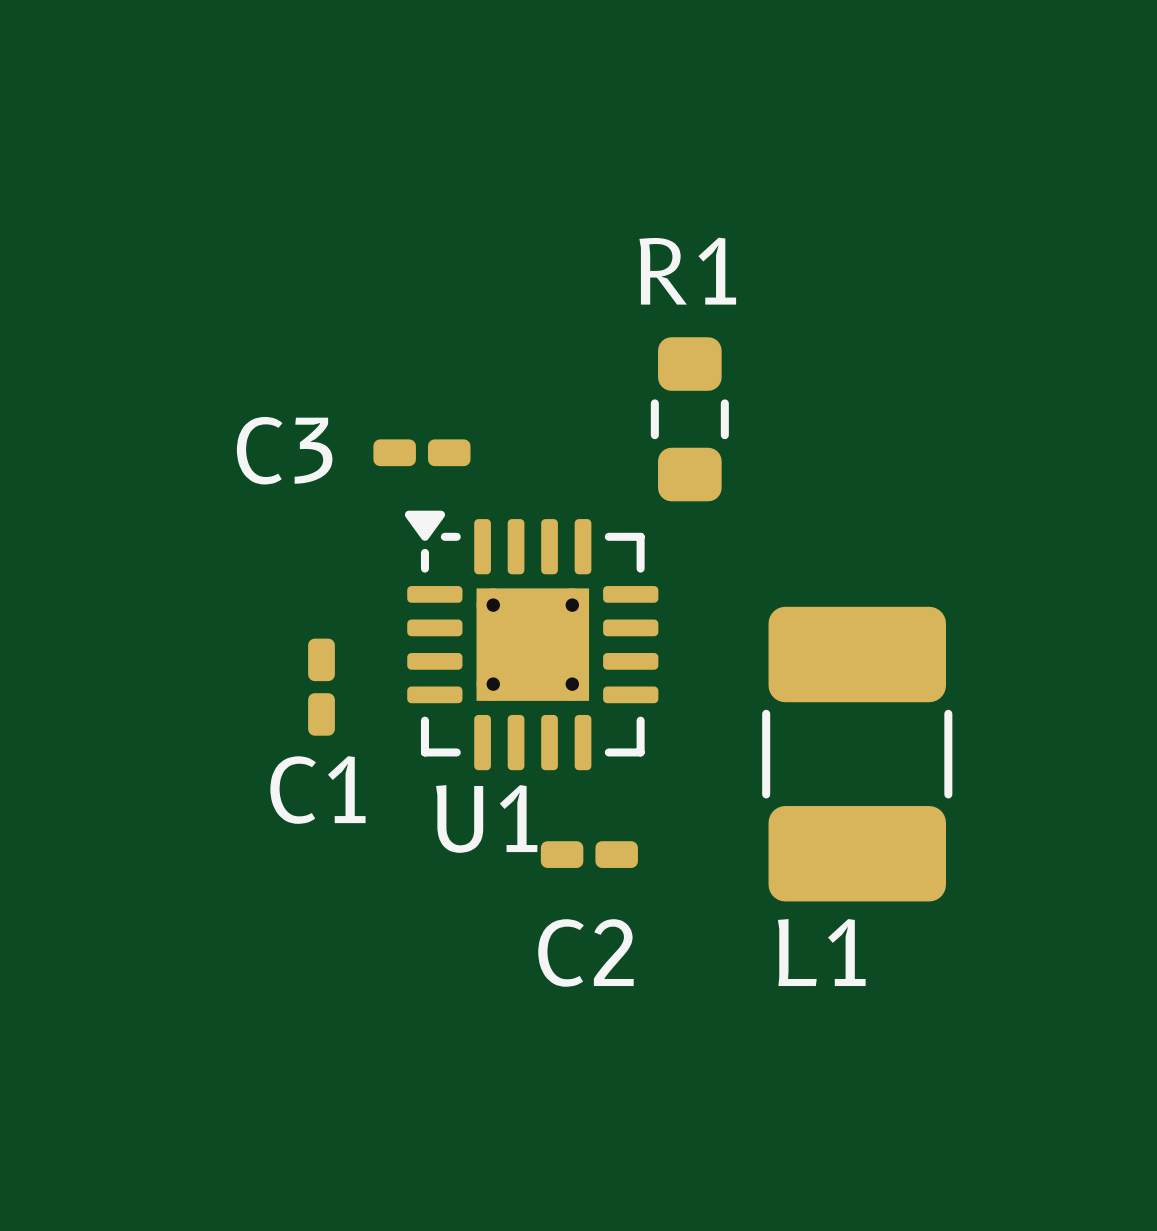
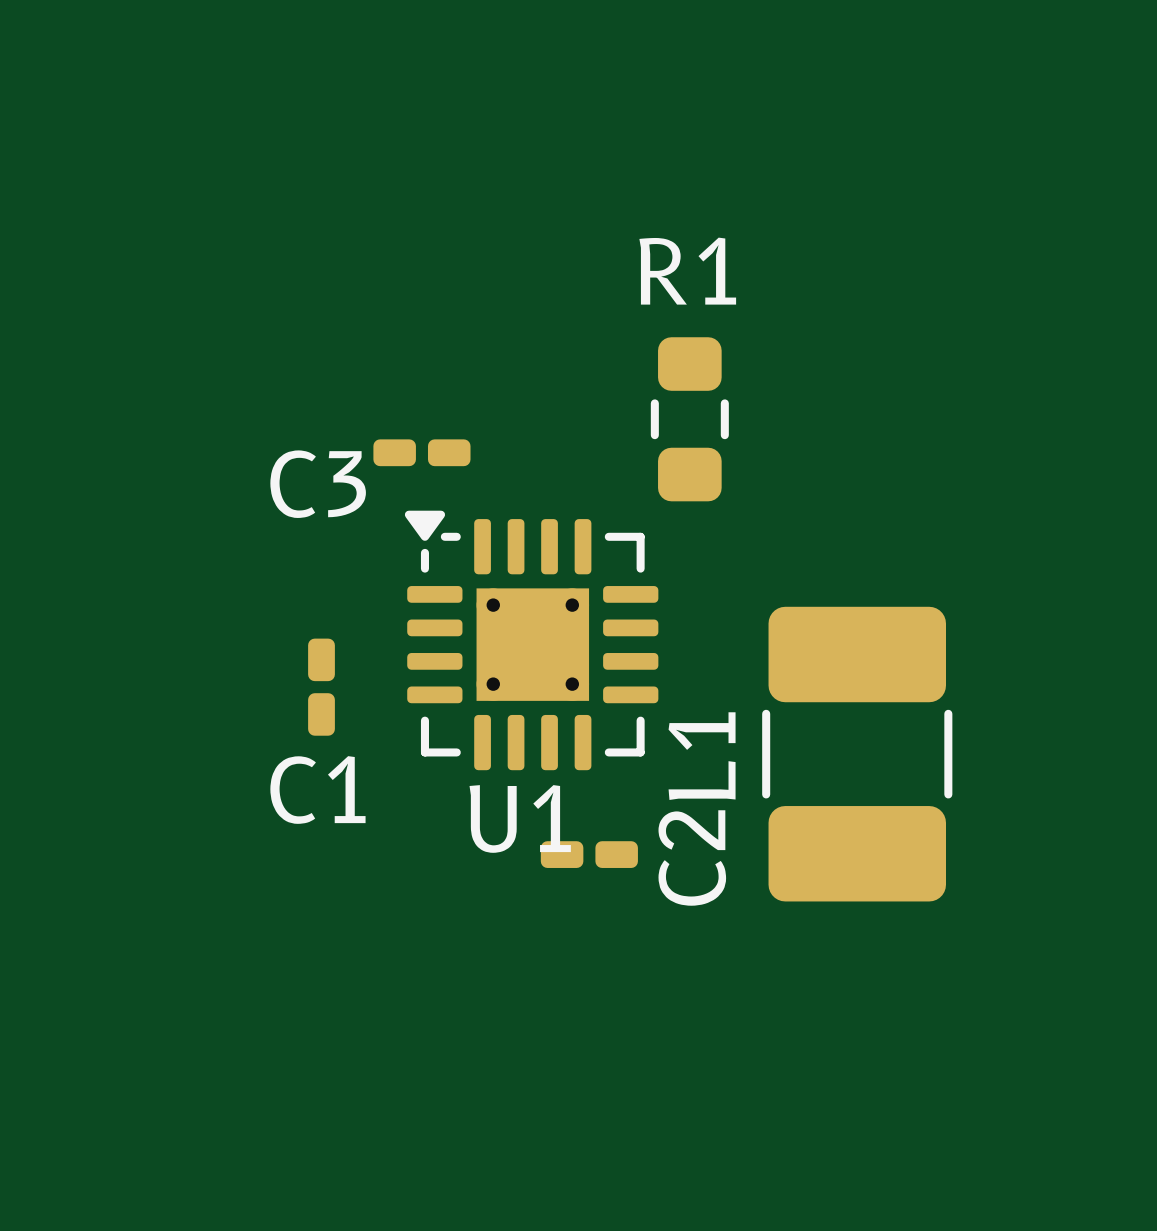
C3 name position: C3 (284, 450) -> C3 (318, 484)
U1 name position: U1 (486, 818) -> U1 (520, 818)
C2 name rotation: 0° (585, 952) -> 90° counterclockwise (692, 858)
L1 name rotation: 0° (821, 952) -> 90° counterclockwise (702, 756)
L1 name position: L1 (821, 952) -> L1 (702, 756)

